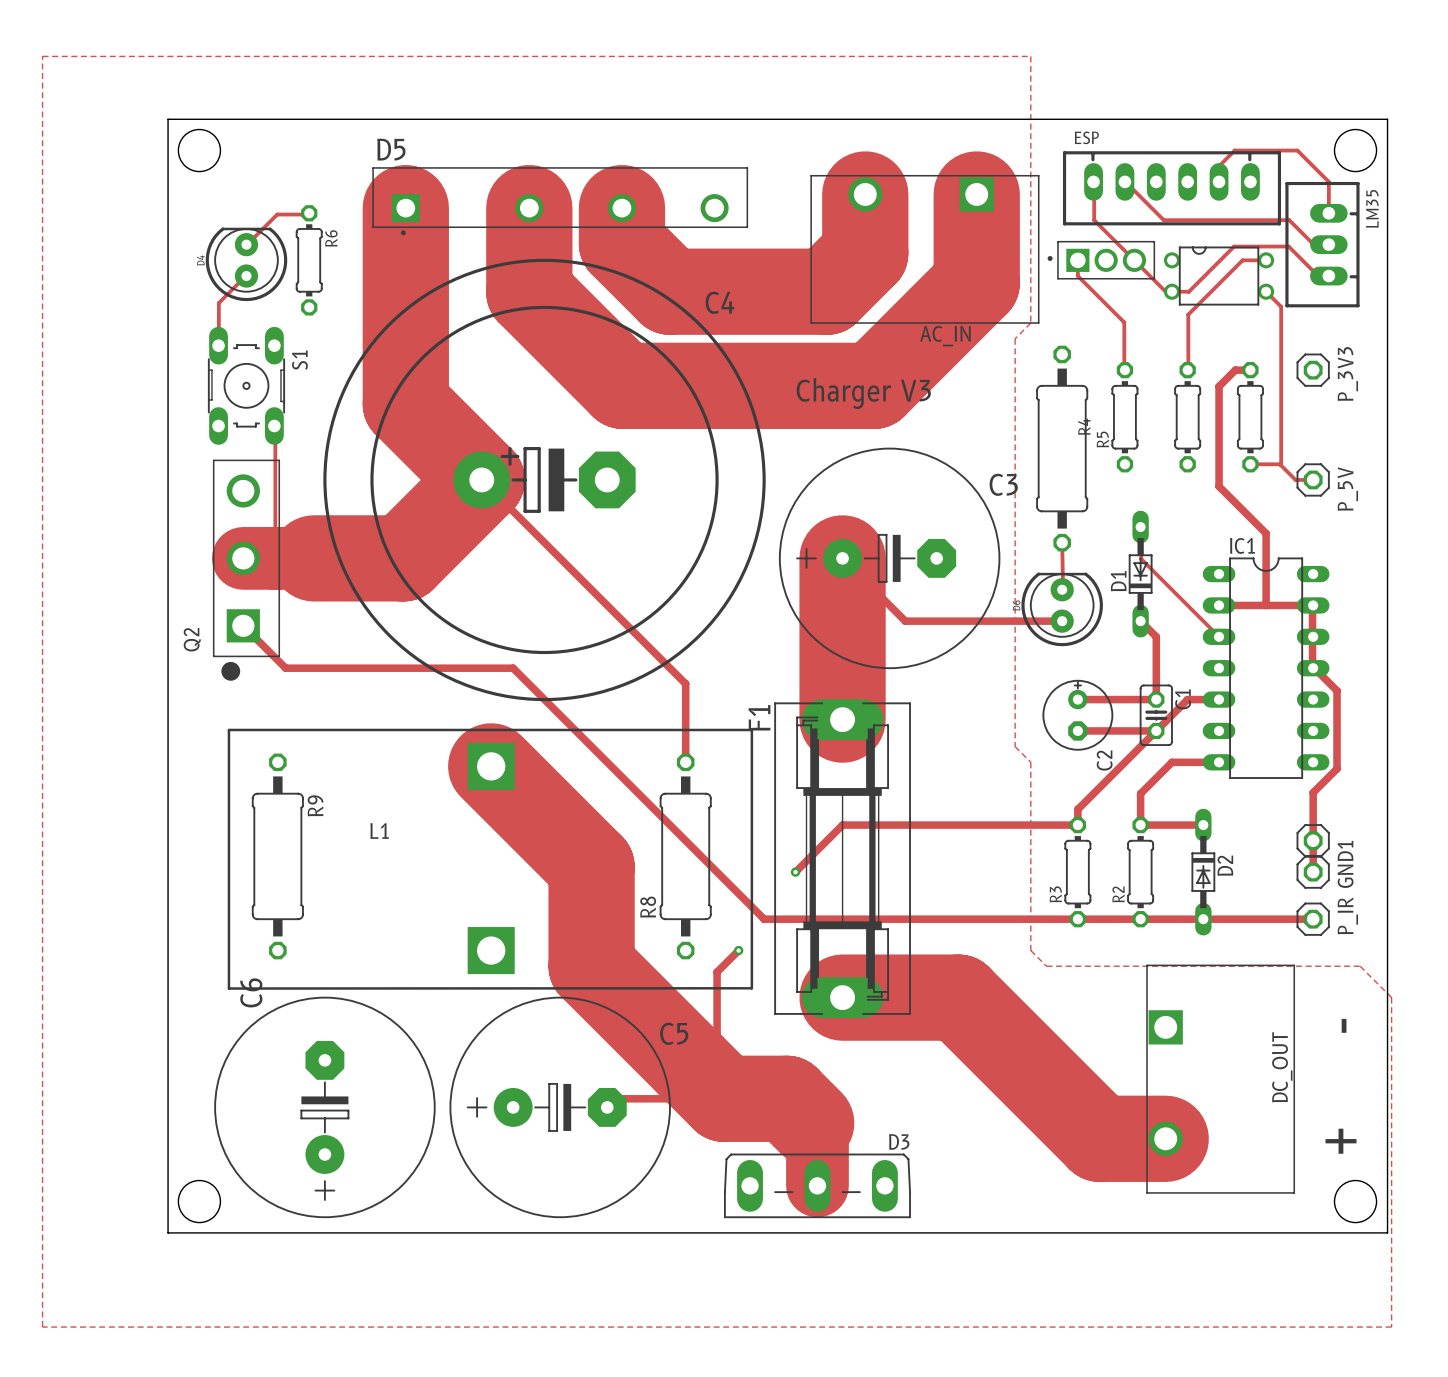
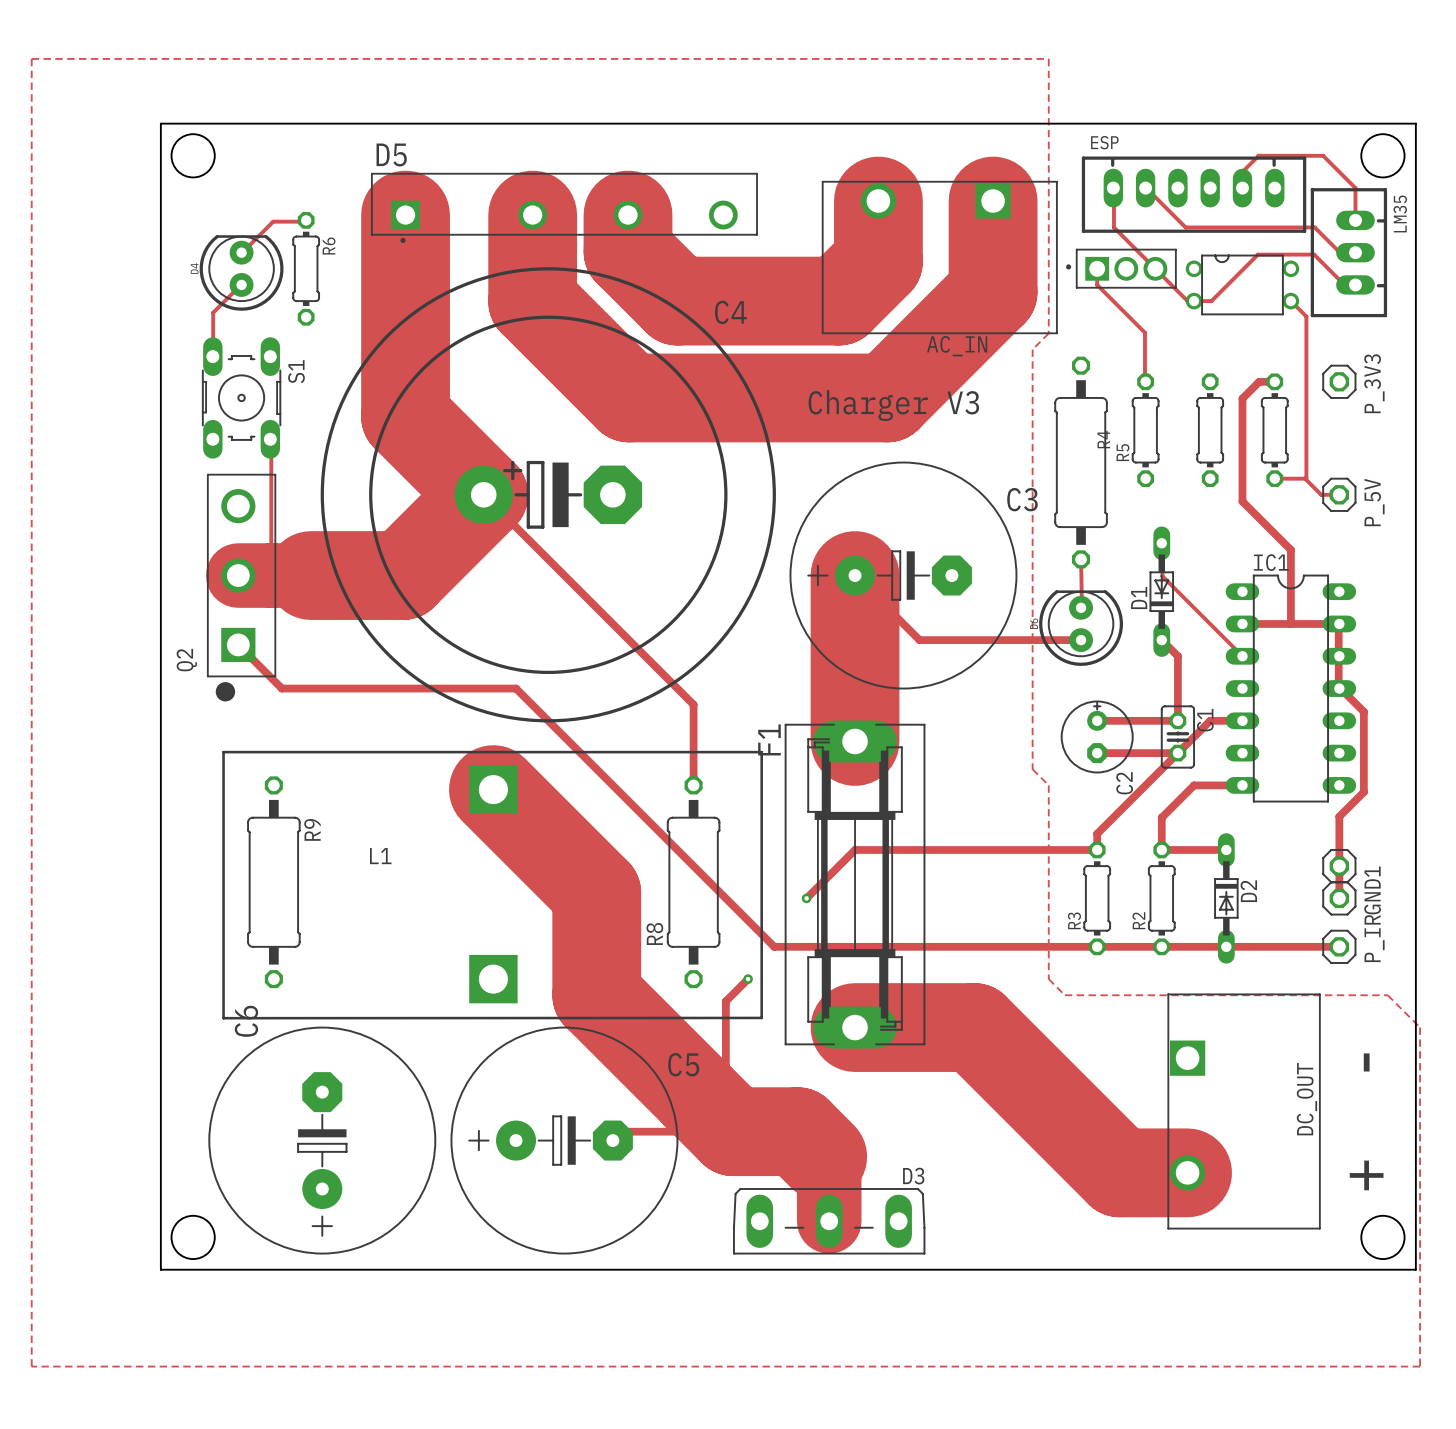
track: (1266, 260) (1242, 260) (1188, 314) (1187, 370) -> none

